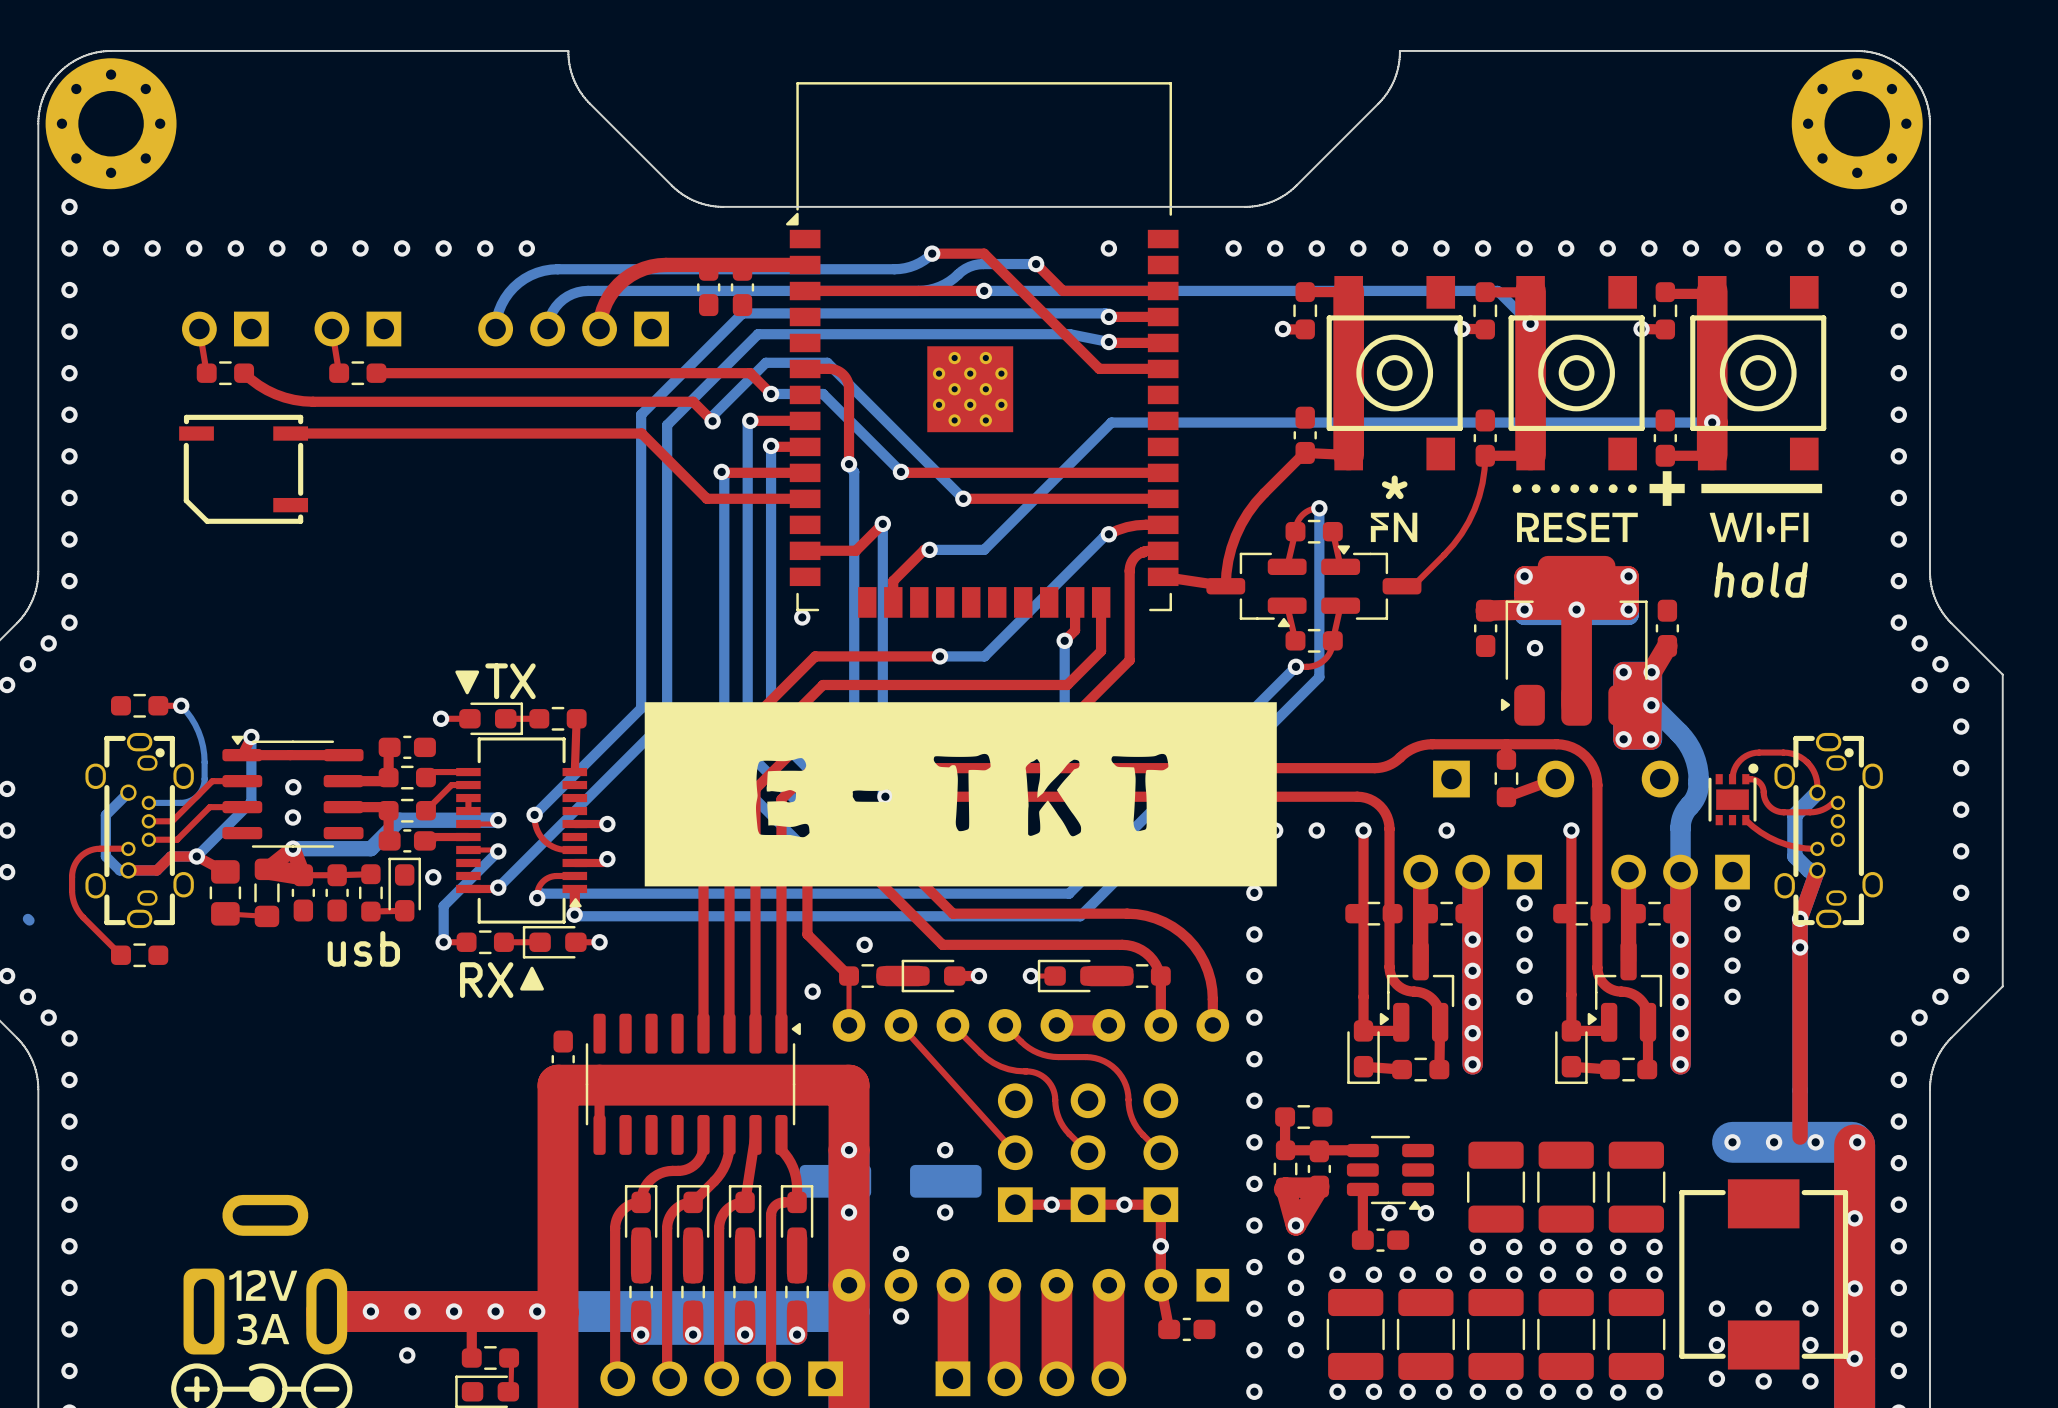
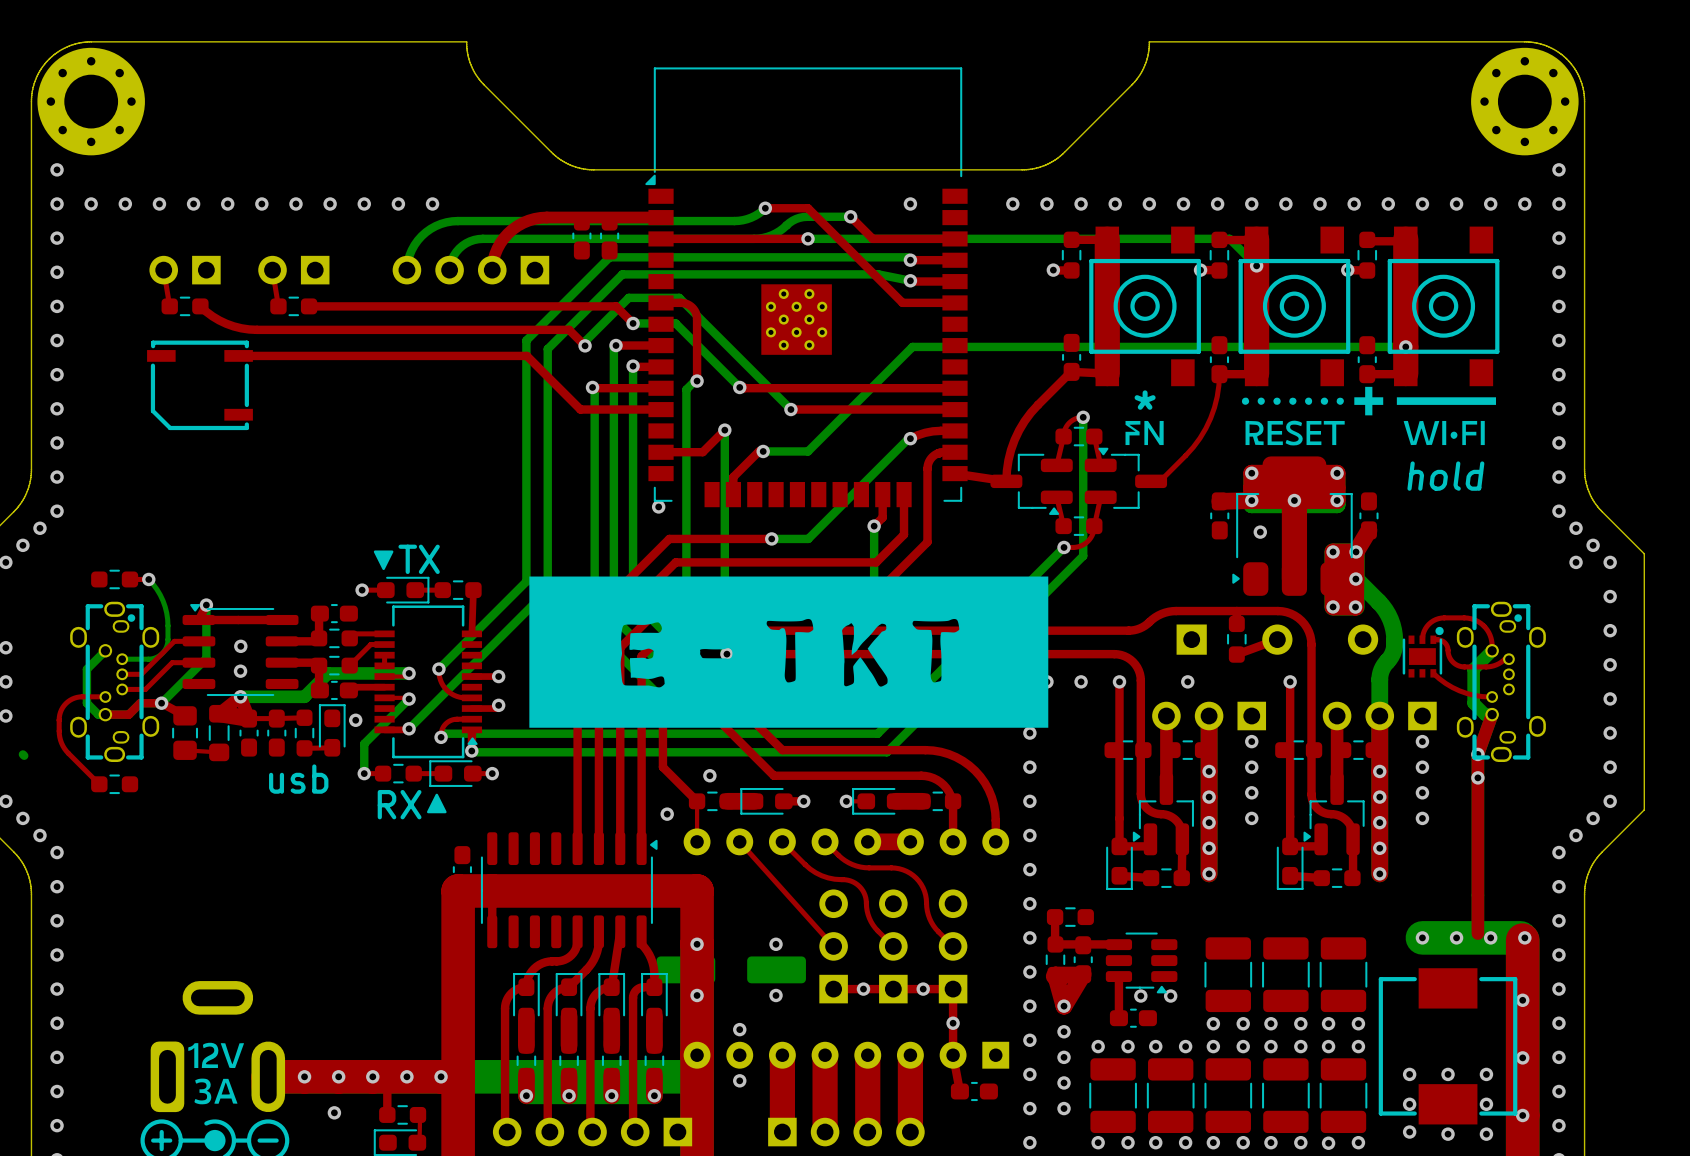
bottom track: (846, 464) (854, 471) (854, 768) -> (694, 381) (686, 389) (686, 615) (701, 630)

